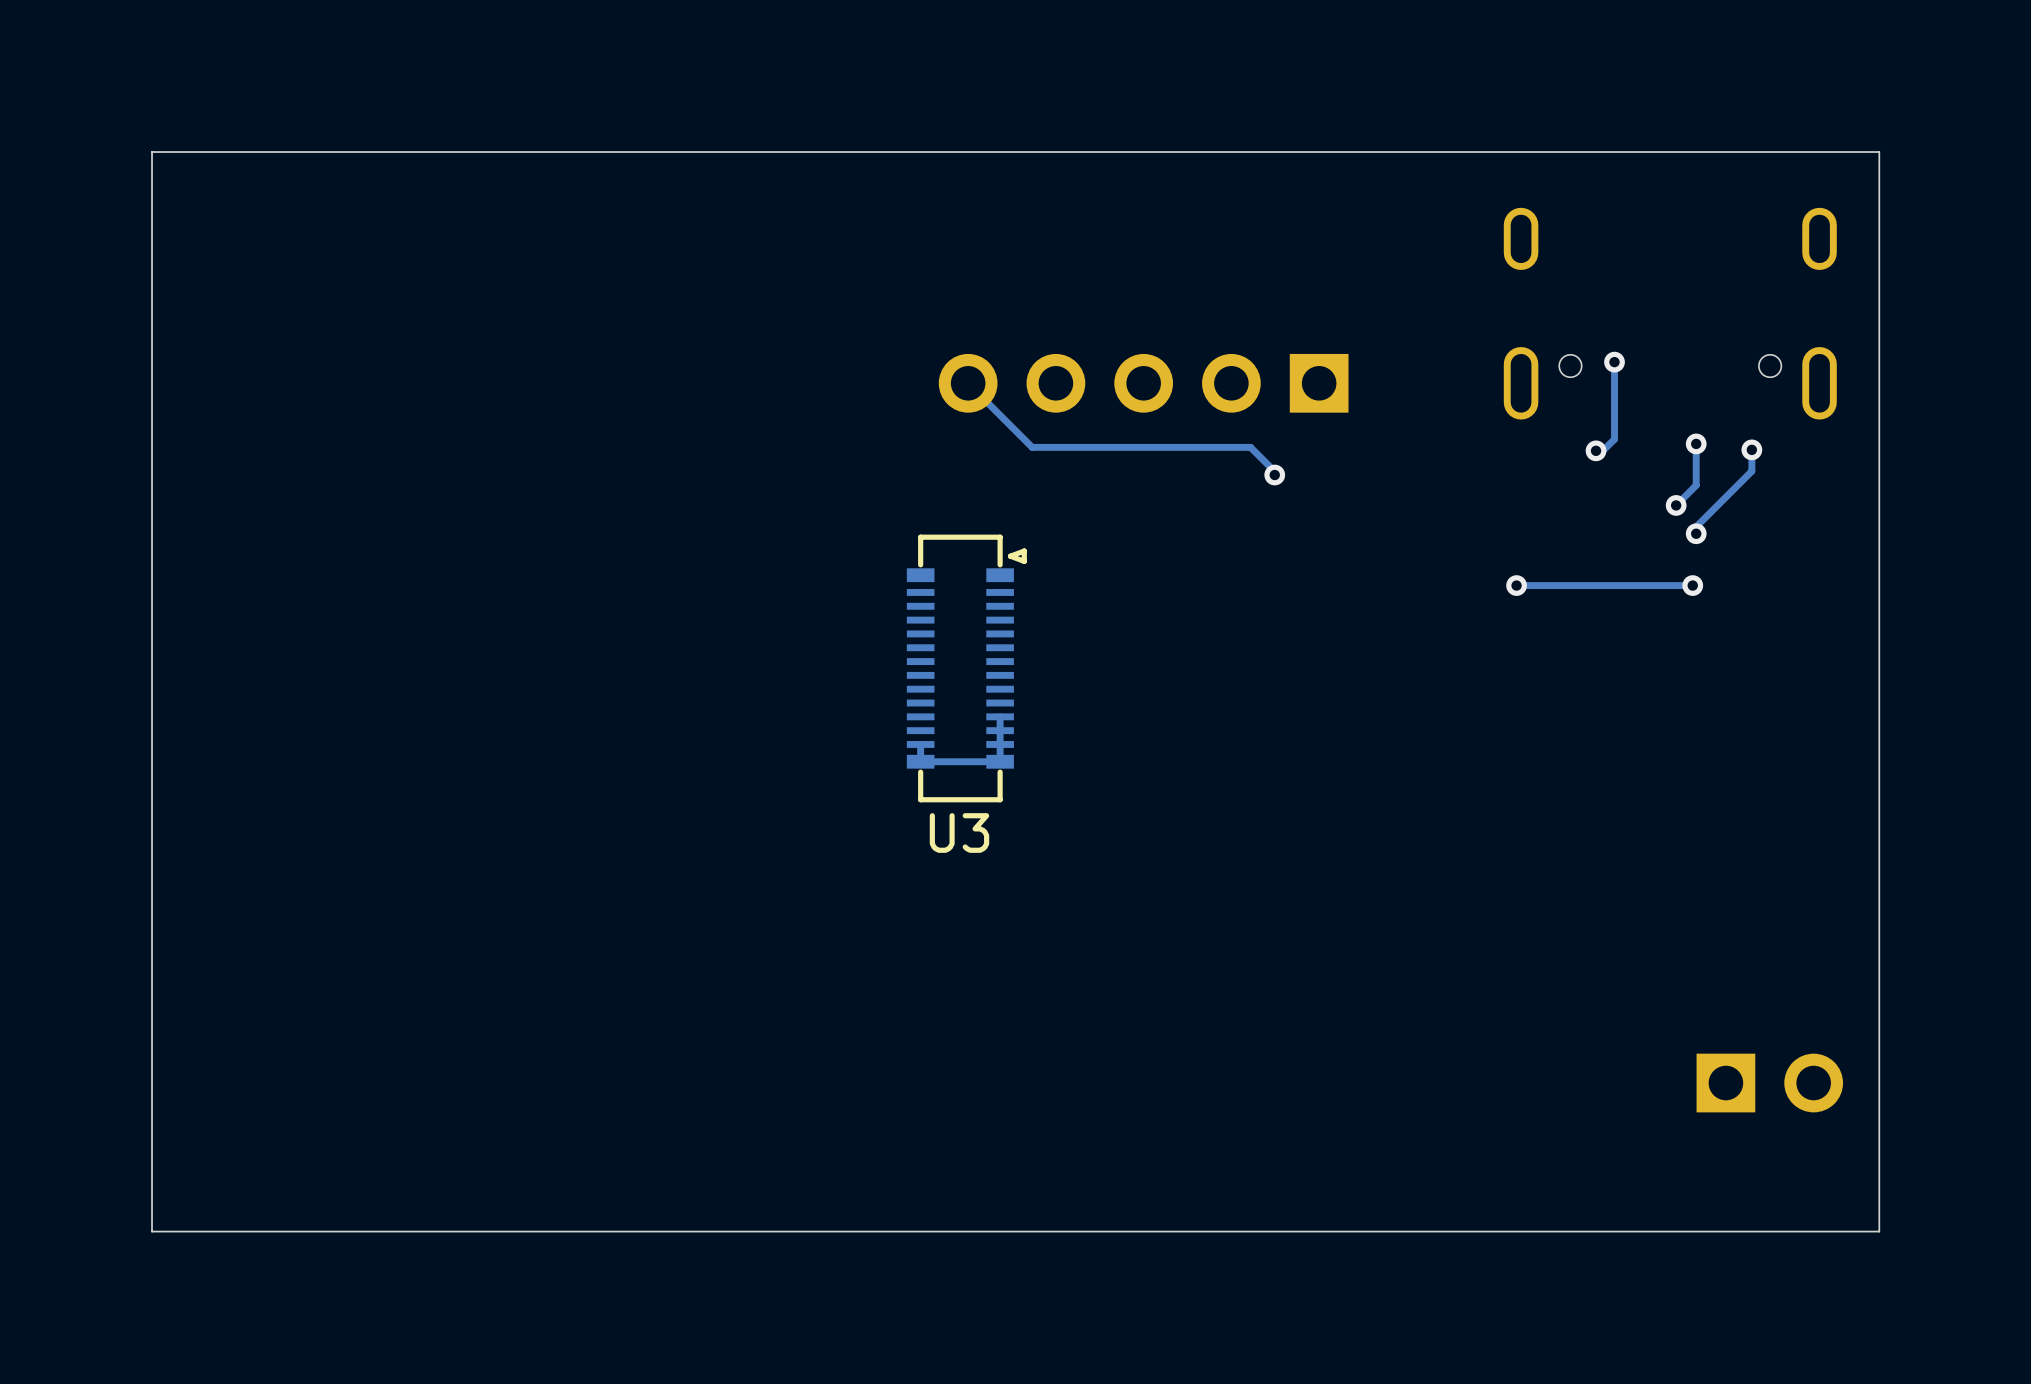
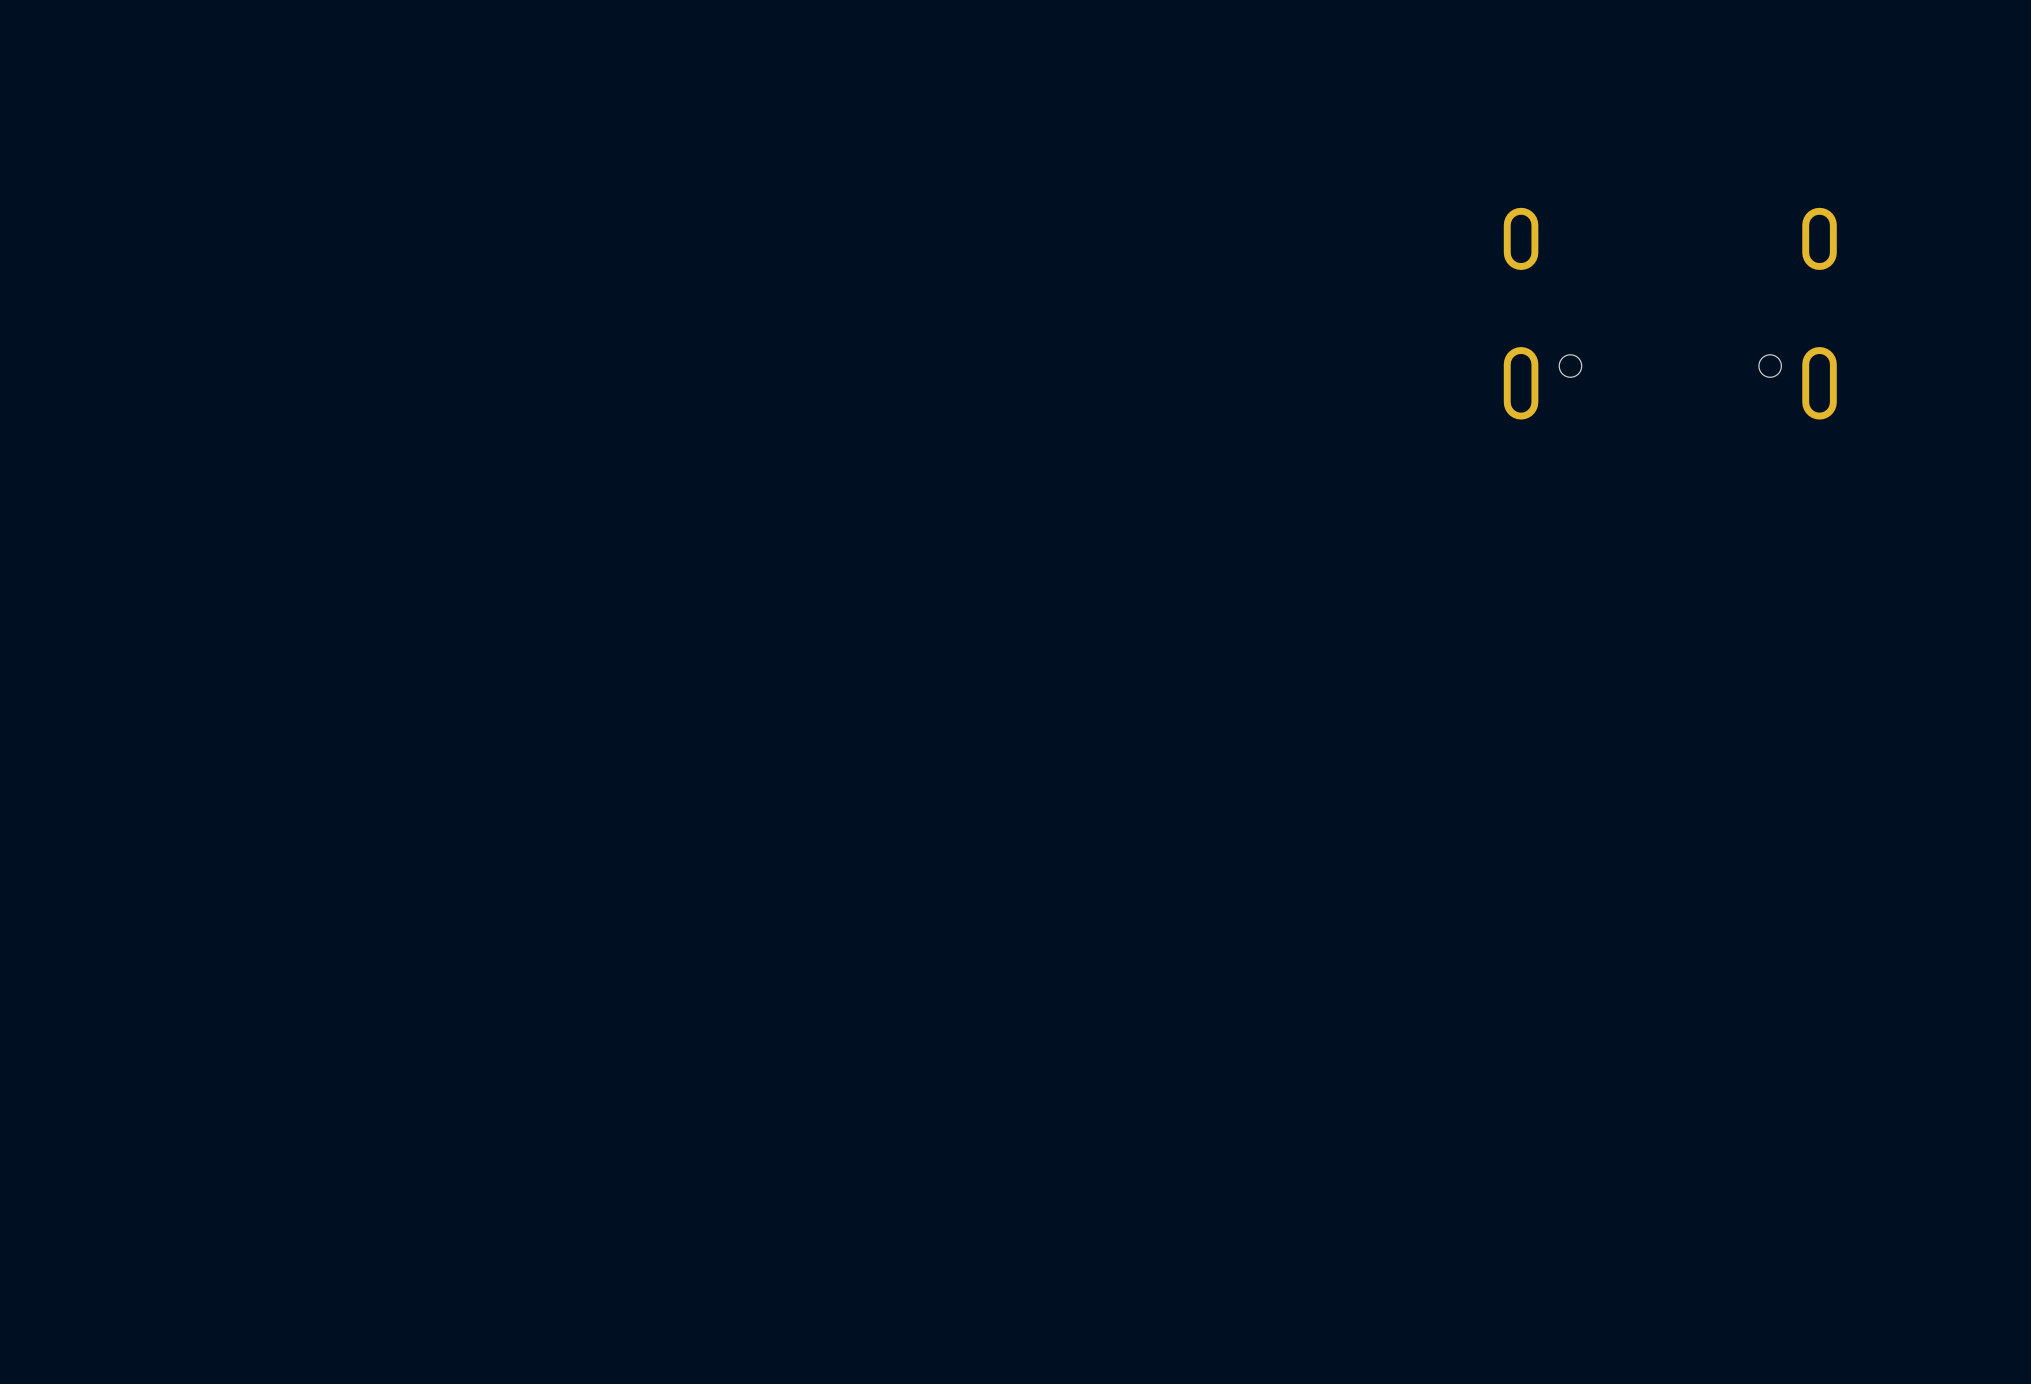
board edge: (1879, 152) (152, 152) (152, 1231) (1879, 1231) (1879, 152) -> none
track: (1614, 362) (1614, 439) (1602, 450) (1596, 450) -> none
via: (1614, 362) -> none
track: (968, 383) (1032, 447) (1250, 447) (1274, 471) (1274, 475) -> none
part: (1143, 383) -> none
track: (1696, 443) (1696, 485) (1676, 505) -> none
via: (1696, 443) -> none
track: (1751, 449) (1751, 471) (1696, 526) (1696, 533) -> none
via: (1751, 449) -> none
via: (1596, 450) -> none
via: (1274, 475) -> none
via: (1676, 505) -> none
via: (1696, 533) -> none
via: (1516, 585) -> none
track: (1692, 585) (1516, 585) -> none
via: (1692, 585) -> none
U3: (966, 668) -> none
track: (1000, 716) (1000, 761) (920, 761) (920, 744) -> none
part: (1769, 1083) -> none

